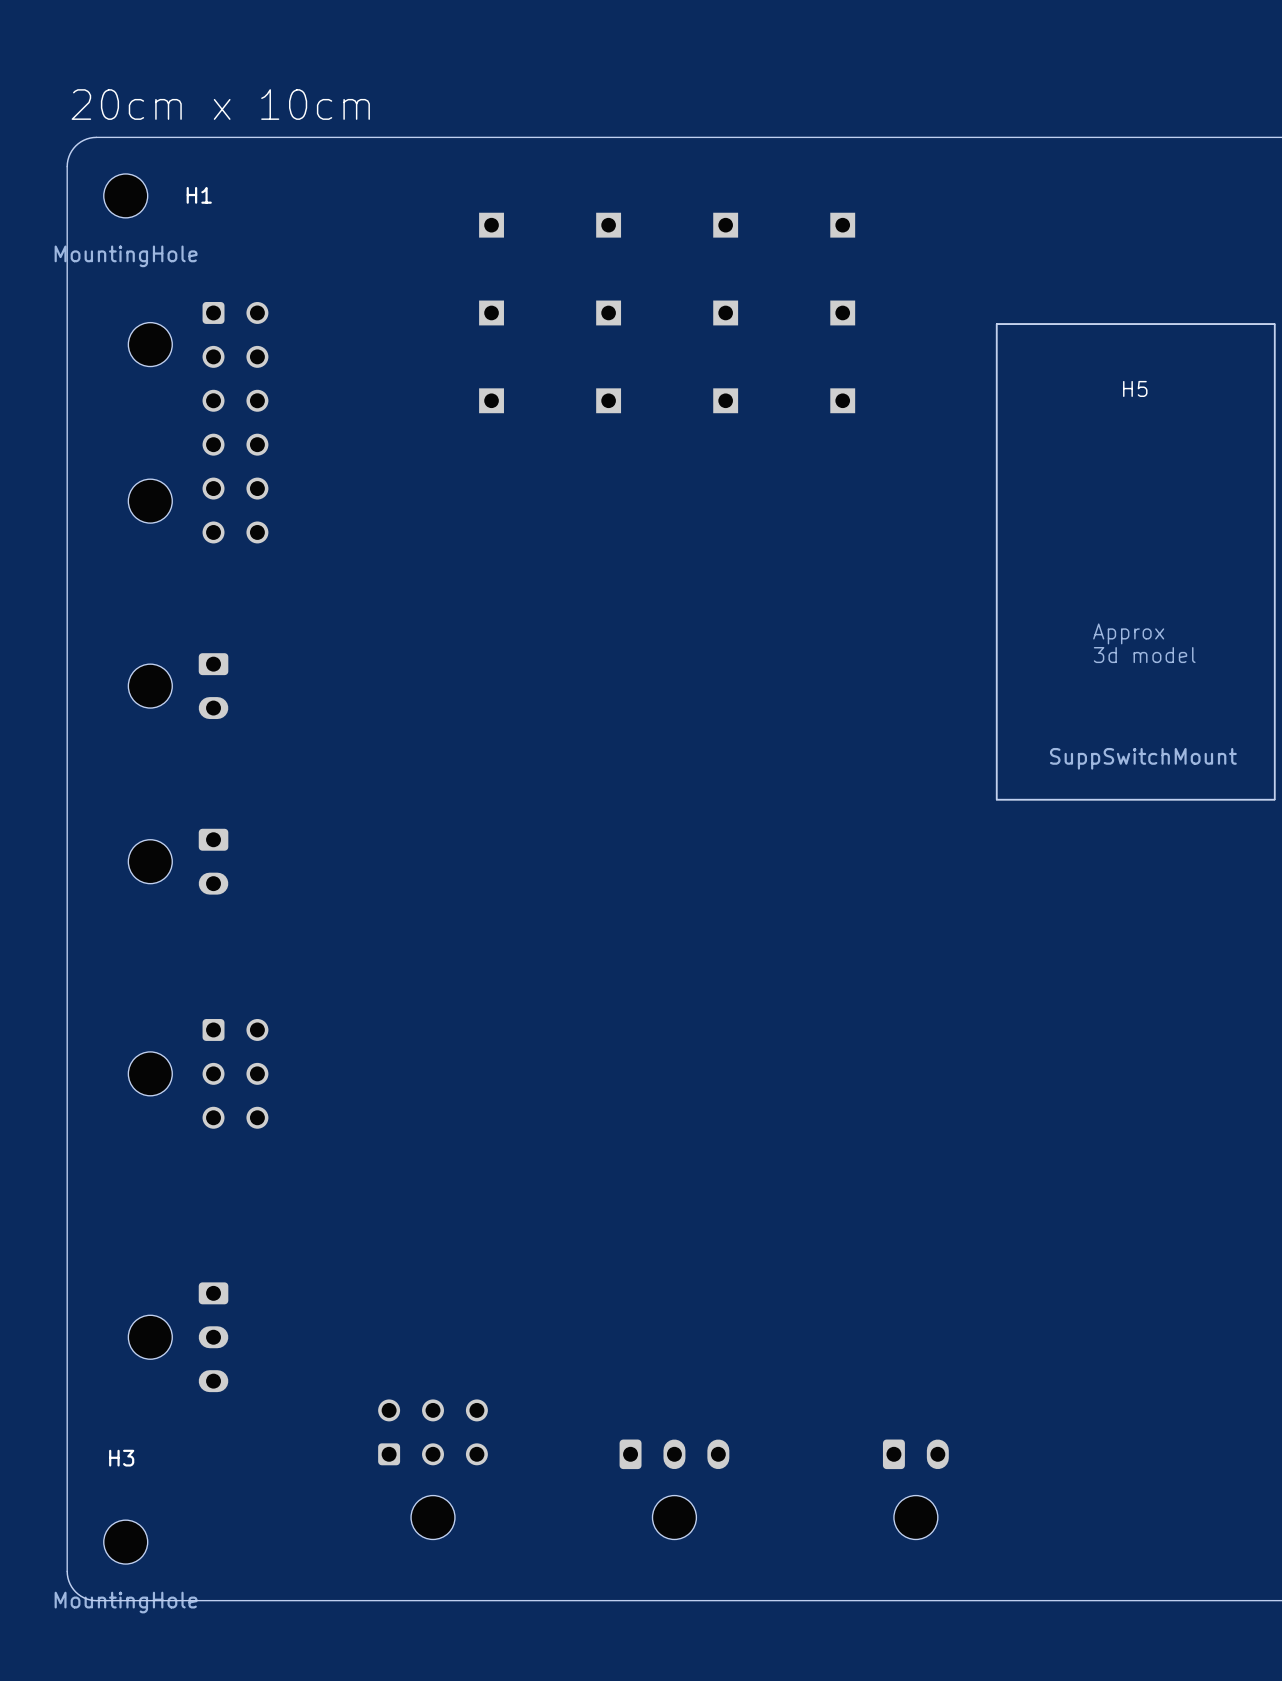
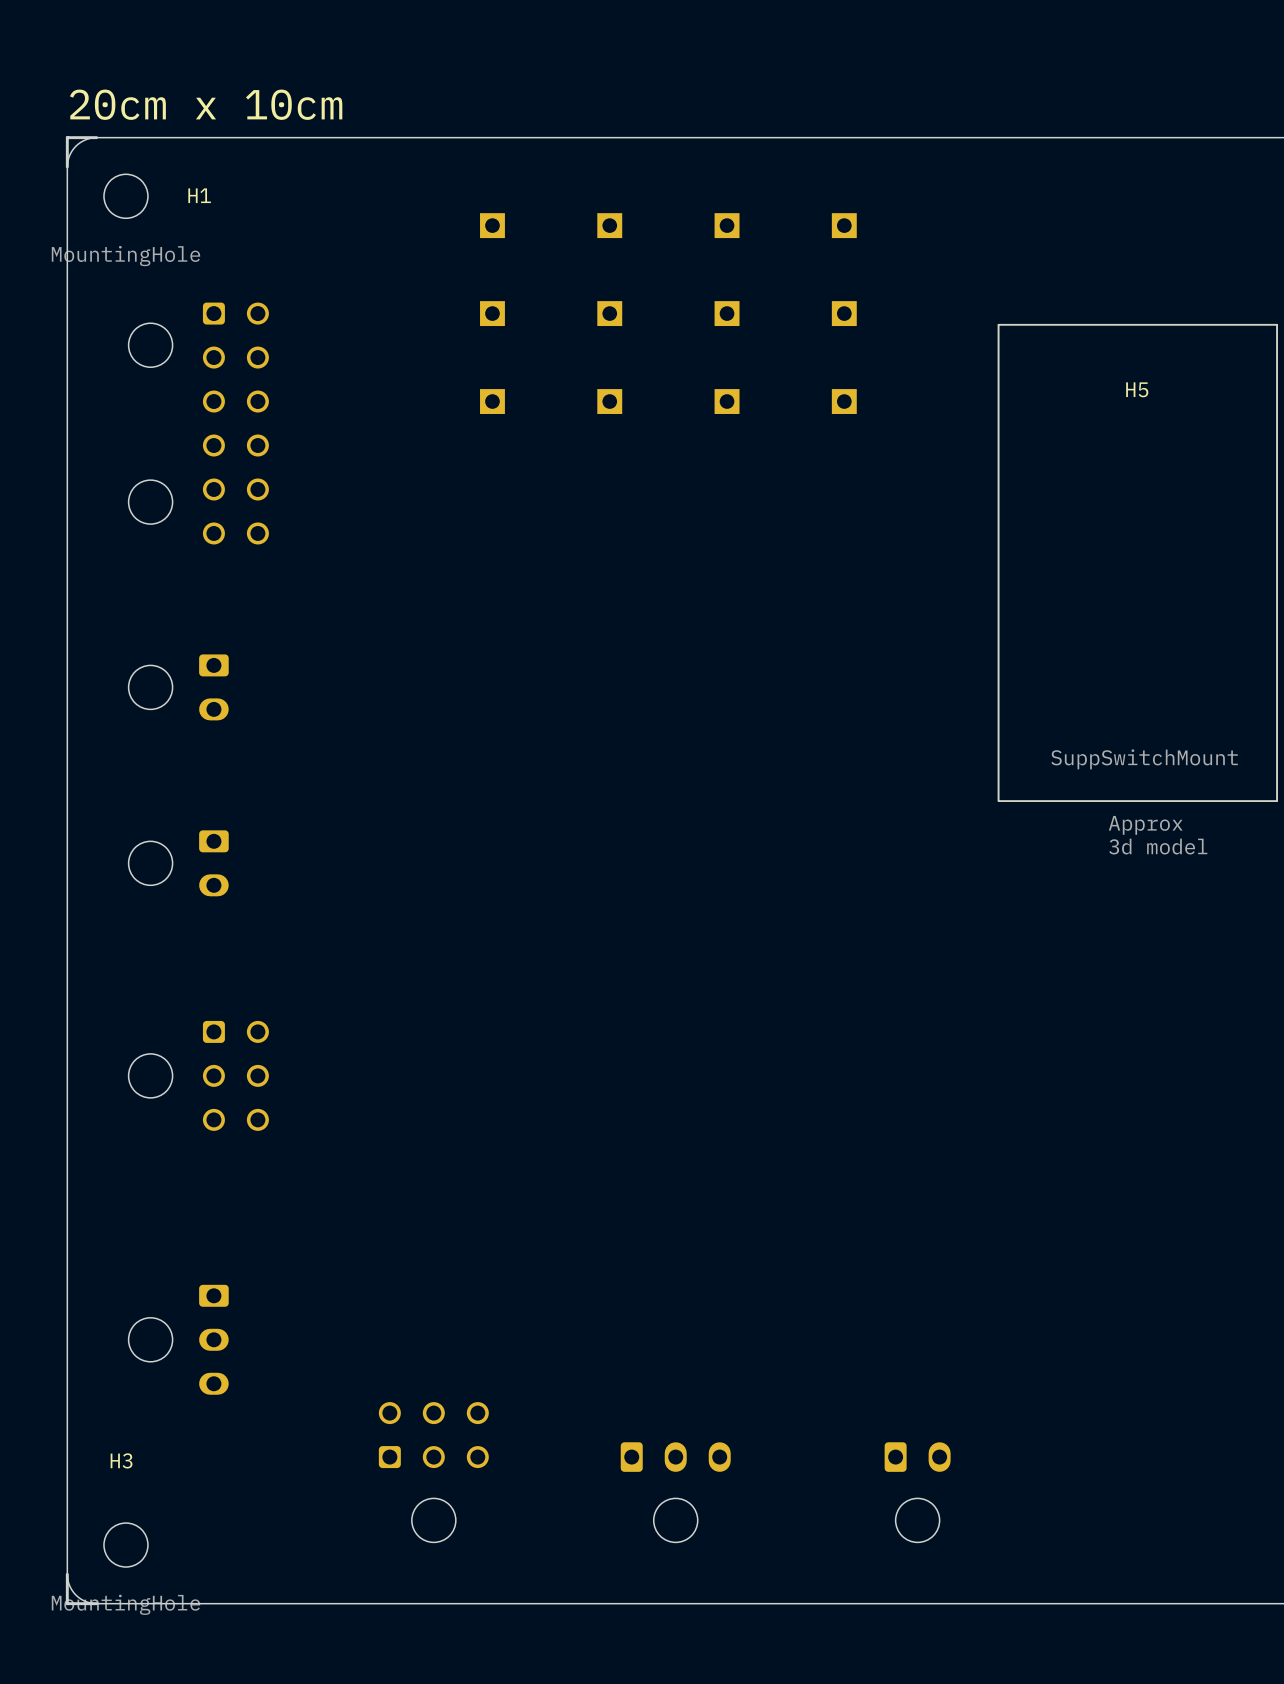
board edge: none -> (96, 137) (67, 137) (67, 166)
text position: Approx (1128, 633) -> Approx (1145, 825)
text position: 3d model (1144, 655) -> 3d model (1158, 846)
board edge: none -> (67, 1574) (67, 1603) (96, 1603)

